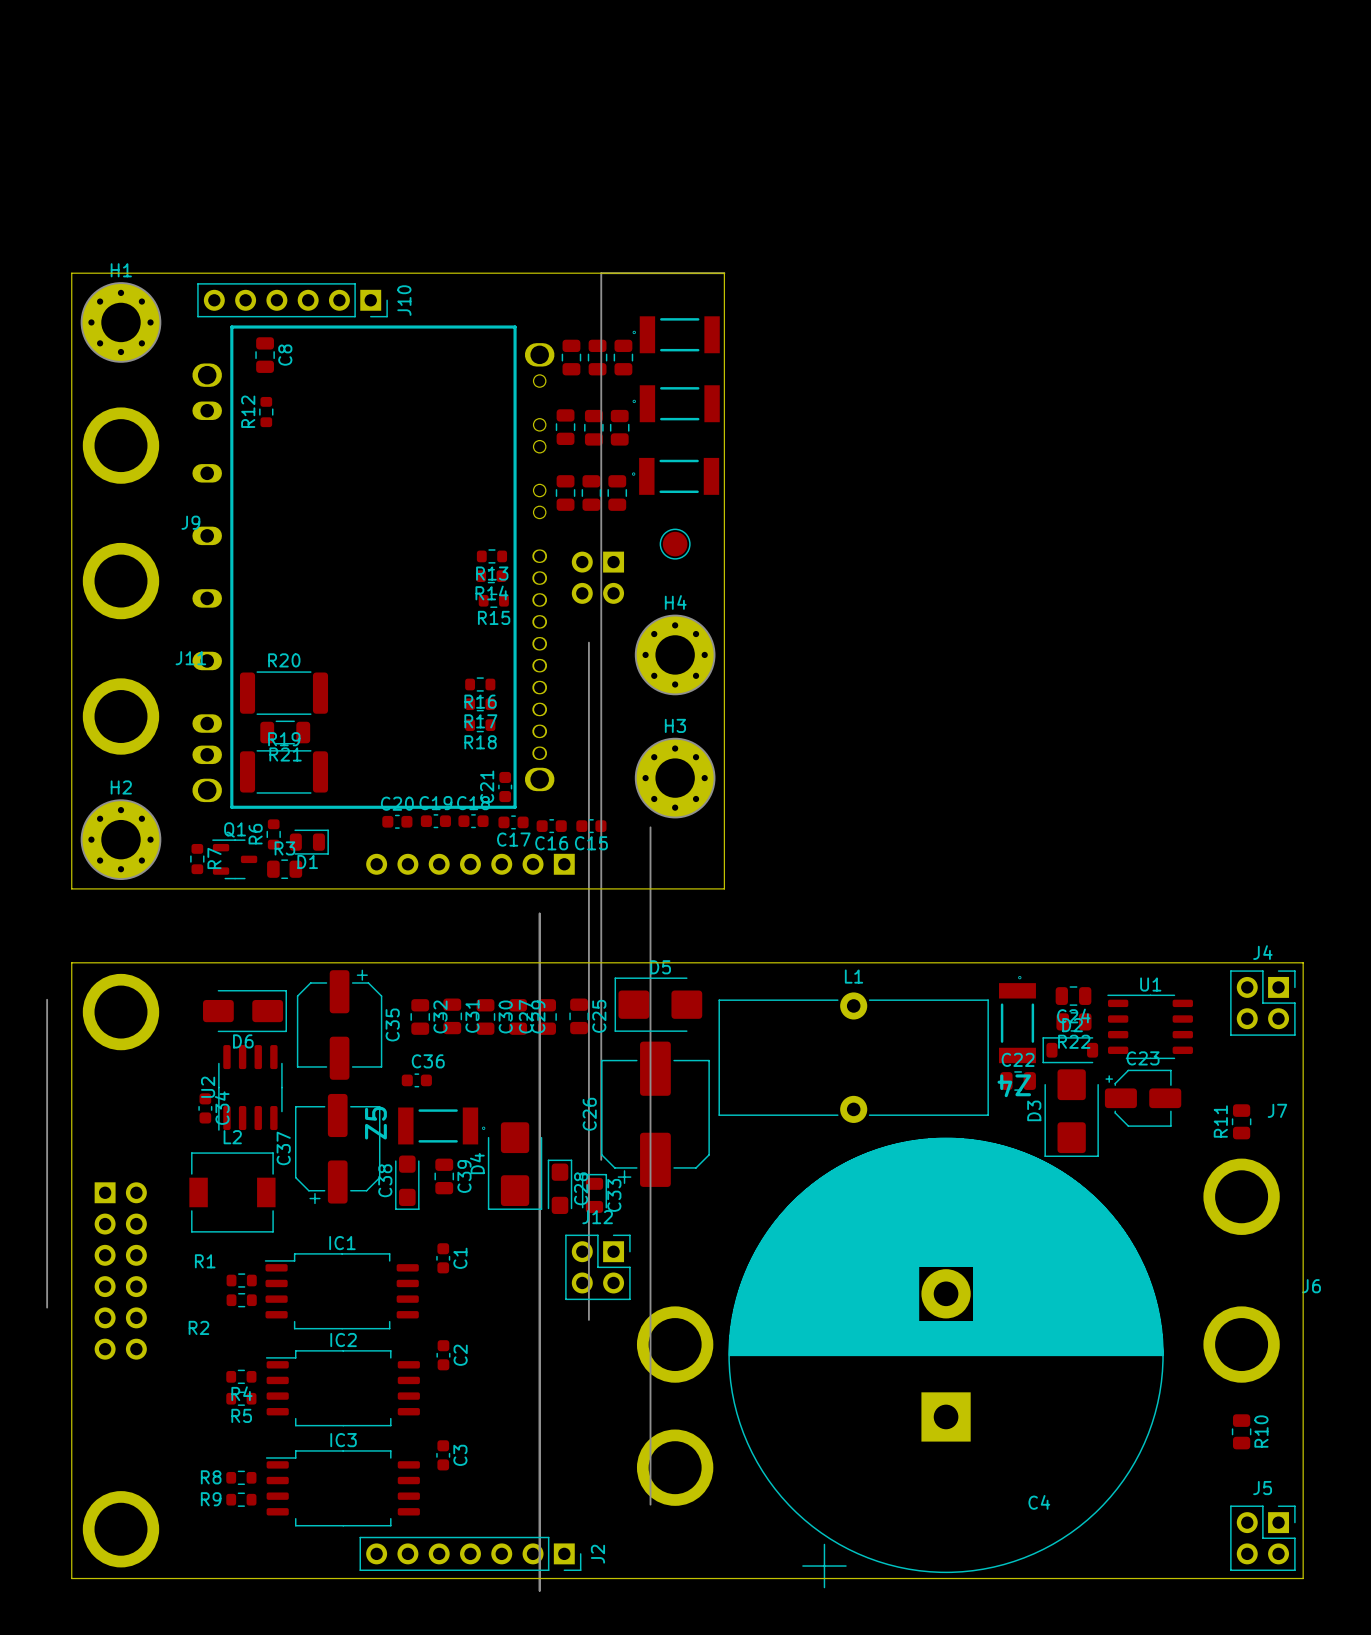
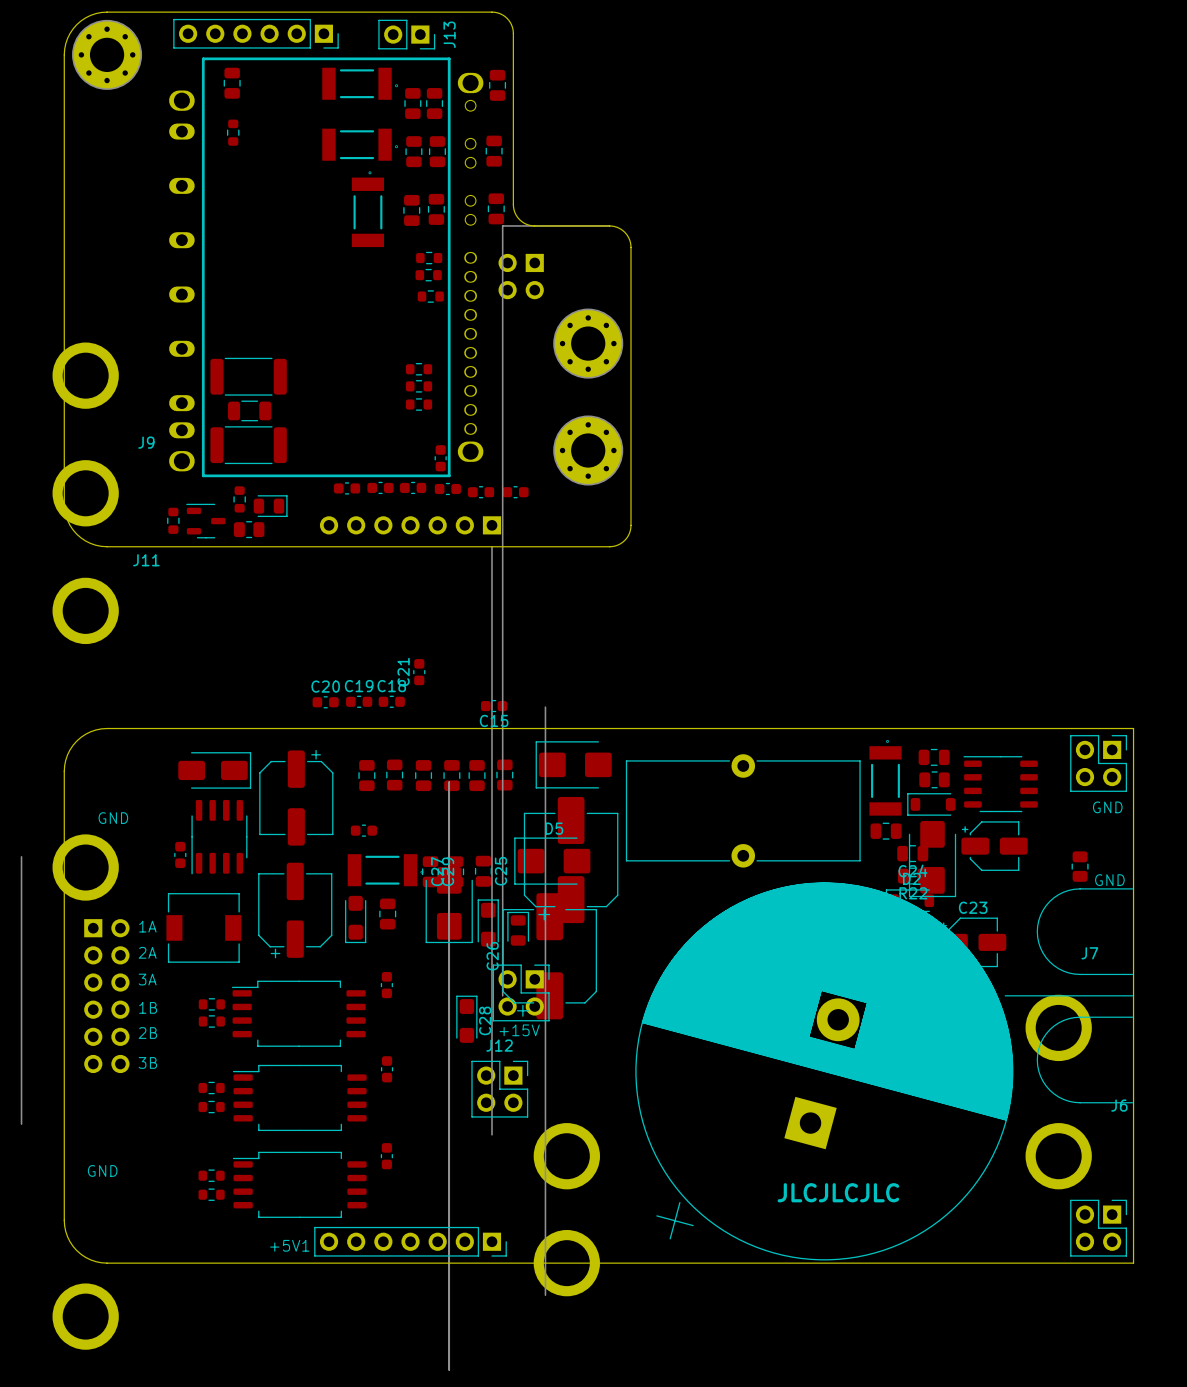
part: none -> (256, 33)
J13: none -> (406, 34)
part: none -> (107, 54)
part: none -> (232, 83)
part: none -> (360, 83)
part: none -> (497, 85)
part: none -> (412, 103)
part: none -> (434, 103)
part: none -> (233, 132)
part: none -> (360, 144)
part: none -> (413, 151)
part: none -> (437, 151)
part: none -> (494, 151)
part: none -> (367, 209)
part: none -> (496, 208)
part: none -> (436, 209)
part: none -> (411, 210)
board edge: (638, 273) (71, 273) (71, 888) (724, 888) (724, 273) -> (534, 225) (527, 224) (519, 219) (513, 206) (513, 31) (508, 20) (501, 14) (491, 12) (107, 12) (85, 17) (70, 33) (64, 54) (64, 503) (70, 525) (85, 541) (107, 546) (609, 546) (620, 543) (627, 536) (630, 525) (630, 247) (628, 238) (624, 232) (616, 227) (609, 225)
J10: (292, 300) -> none
part: none -> (429, 258)
H1: (120, 322) -> none
part: none -> (428, 275)
part: (676, 334) -> none
part: none -> (430, 296)
C8: (265, 355) -> none
part: (571, 357) -> none
part: (597, 357) -> none
part: (623, 357) -> none
part: (676, 403) -> none
part: none -> (588, 343)
R12: (266, 412) -> none
part: (565, 427) -> none
part: (593, 427) -> none
part: (619, 427) -> none
part: none -> (419, 369)
part: none -> (248, 376)
part: none -> (419, 386)
part: (675, 476) -> none
part: none -> (419, 404)
part: none -> (249, 410)
part: (565, 493) -> none
part: (591, 493) -> none
part: (617, 493) -> none
part: none -> (248, 445)
part: none -> (588, 450)
part: none -> (440, 458)
part: (675, 544) -> none
R13: (491, 556) -> none
part position: (373, 567) -> (326, 267)
part: none -> (380, 487)
part: none -> (413, 487)
part: none -> (347, 488)
R14: (491, 576) -> none
part: none -> (447, 489)
part position: (597, 577) -> (521, 276)
part: none -> (481, 492)
part: none -> (515, 492)
part: none -> (239, 499)
part: none -> (270, 506)
R15: (493, 600) -> none
part: none -> (173, 520)
part: none -> (205, 521)
part: none -> (249, 529)
H4: (675, 654) -> none
R16: (480, 684) -> none
R20: (284, 693) -> none
R17: (480, 704) -> none
R18: (480, 725) -> none
R21: (285, 732) -> none
R19: (284, 771) -> none
H3: (675, 778) -> none
C17: (513, 822) -> none
C16: (551, 826) -> none
R6: (273, 834) -> none
H2: (120, 839) -> none
D1: (309, 842) -> none
R7: (197, 859) -> none
Q1: (234, 859) -> none
part position: (470, 864) -> (410, 525)
R3: (284, 869) -> none
part: none -> (934, 757)
part: none -> (1098, 763)
part: none -> (573, 764)
part: none -> (214, 770)
part: none -> (394, 775)
part: none -> (504, 775)
part: none -> (366, 775)
part: none -> (423, 775)
part: none -> (451, 775)
part: none -> (477, 775)
part: none -> (885, 777)
part: none -> (934, 779)
part: none -> (1000, 784)
part: none -> (296, 797)
part: none -> (931, 804)
text: none -> GND (1107, 807)
part: none -> (743, 810)
text: none -> GND (113, 818)
board edge: (71, 962) (71, 1578) (1303, 1578) (1303, 962) (71, 962) -> (107, 728) (90, 731) (76, 741) (67, 754) (64, 771) (64, 1220) (70, 1241) (85, 1257) (107, 1263) (1133, 1263) (1133, 728) (107, 728)
part: none -> (363, 830)
part: none -> (886, 831)
part: none -> (219, 837)
part: none -> (994, 846)
part: none -> (180, 854)
part: none -> (932, 859)
part: none -> (571, 860)
J4: (1262, 1003) -> none
part: none -> (1080, 866)
D6: (245, 1011) -> none
part: none -> (385, 870)
C32: (420, 1016) -> none
C31: (452, 1016) -> none
C30: (485, 1016) -> none
Z4: (1017, 1019) -> none
C35: (339, 1024) -> none
U1: (1150, 1026) -> none
text: none -> GND (1109, 880)
line: none -> (1132, 888) (1080, 888) (1063, 892) (1046, 905) (1038, 920) (1037, 931) (1038, 942) (1046, 957) (1063, 971) (1080, 974) (1132, 974)
part: none -> (449, 905)
L1: (853, 1057) -> none
part: none -> (295, 910)
part: none -> (387, 914)
part: none -> (355, 919)
part: none -> (488, 923)
text: none -> 1A (147, 926)
C36: (416, 1080) -> none
part: none -> (203, 927)
C22: (1018, 1081) -> none
part: none -> (518, 928)
U2: (250, 1087) -> none
C34: (205, 1108) -> none
text: none -> 2A (147, 952)
D3: (1071, 1113) -> none
R11: (1241, 1121) -> none
Z5: (441, 1125) -> none
text: none -> 3A (147, 979)
part: none -> (386, 985)
C37: (337, 1149) -> none
part: none -> (521, 992)
line: none -> (1005, 995) (1132, 995)
D4: (515, 1166) -> none
part: none -> (211, 1004)
text: none -> 1B (148, 1007)
C39: (444, 1176) -> none
part: none -> (298, 1013)
C38: (407, 1182) -> none
line: none -> (1132, 1017) (1080, 1017) (1063, 1020) (1046, 1033) (1038, 1048) (1037, 1059) (1038, 1071) (1046, 1086) (1063, 1099) (1080, 1102) (1132, 1102)
part: none -> (211, 1021)
L2: (232, 1192) -> none
C33: (594, 1193) -> none
text: none -> +15V (519, 1030)
text: none -> 2B (147, 1033)
text: none -> 3B (147, 1062)
part: none -> (387, 1069)
part: none -> (824, 1071)
C1: (443, 1258) -> none
part: none -> (211, 1088)
part position: (120, 1270) -> (106, 996)
part: none -> (299, 1097)
R1: (241, 1280) -> none
part: none -> (211, 1107)
IC1: (341, 1291) -> none
R2: (241, 1300) -> none
part: none -> (386, 1156)
C2: (443, 1355) -> none
text: none -> GND (102, 1170)
C4: (946, 1362) -> none
part: none -> (211, 1175)
R4: (241, 1376) -> none
part: none -> (299, 1184)
text: none -> JLCJLCJLC (838, 1192)
part: none -> (211, 1194)
IC2: (342, 1388) -> none
R5: (241, 1398) -> none
part: none -> (1098, 1228)
R10: (1241, 1431) -> none
part: none -> (410, 1241)
text: none -> +5V1 (289, 1245)
C3: (443, 1455) -> none
R8: (241, 1477) -> none
IC3: (342, 1488) -> none
R9: (241, 1499) -> none
J5: (1262, 1538) -> none
J2: (470, 1553) -> none

